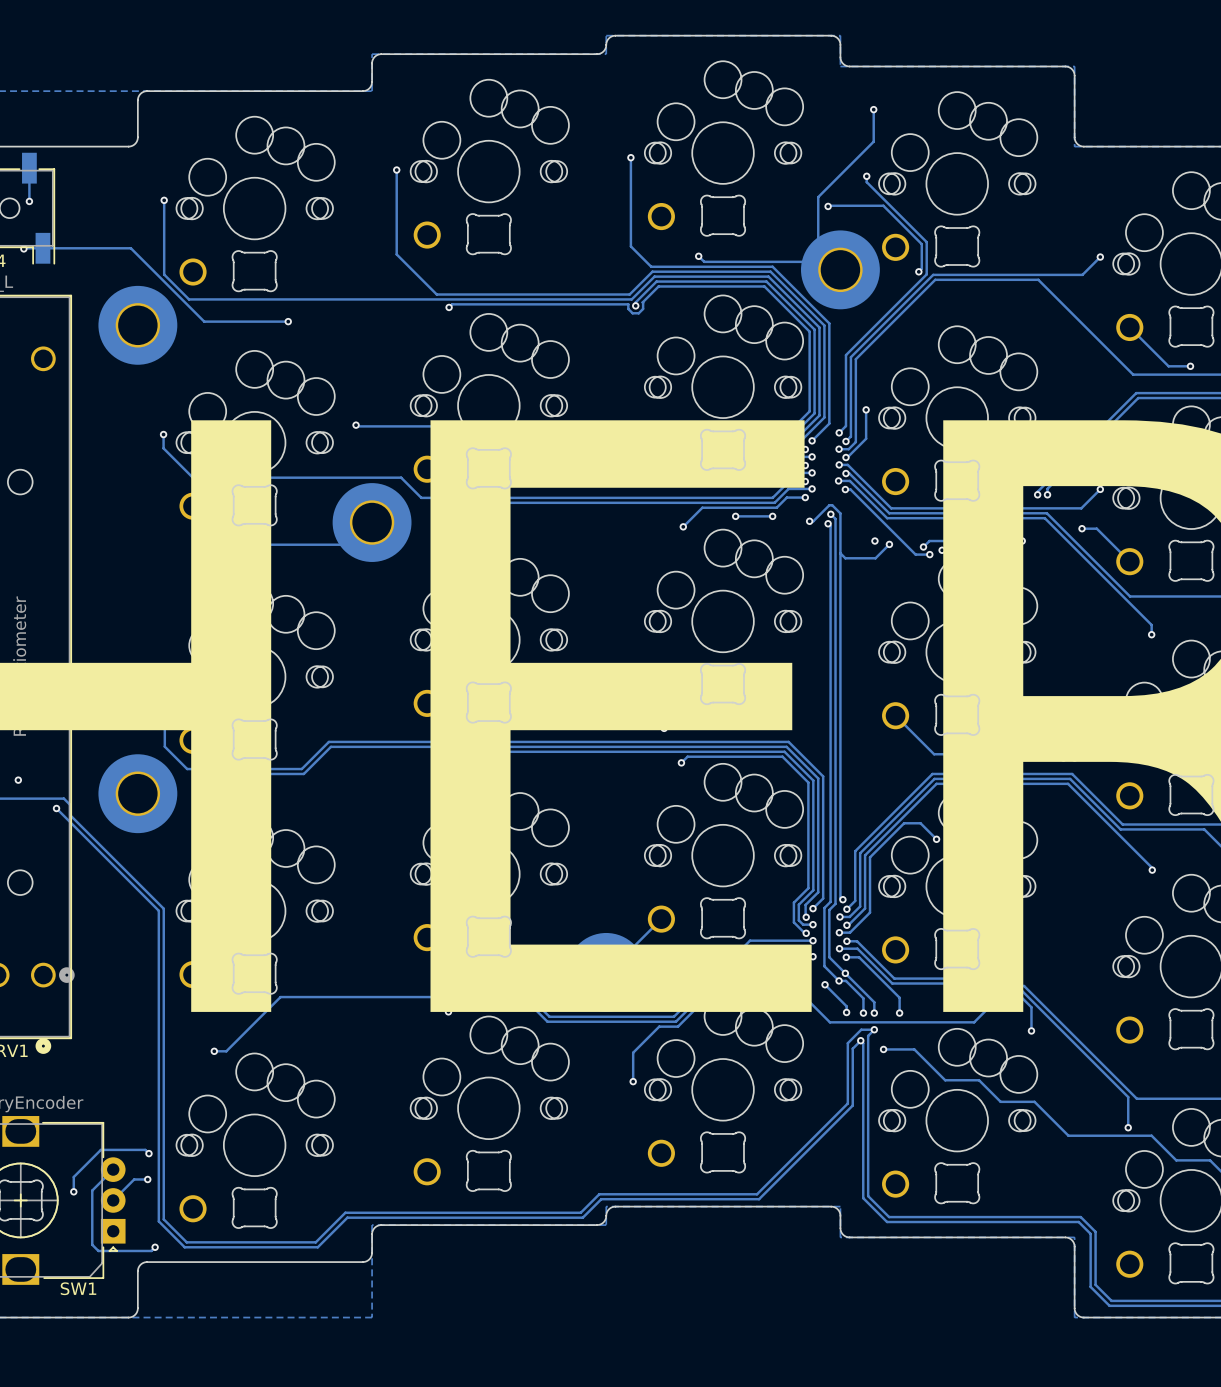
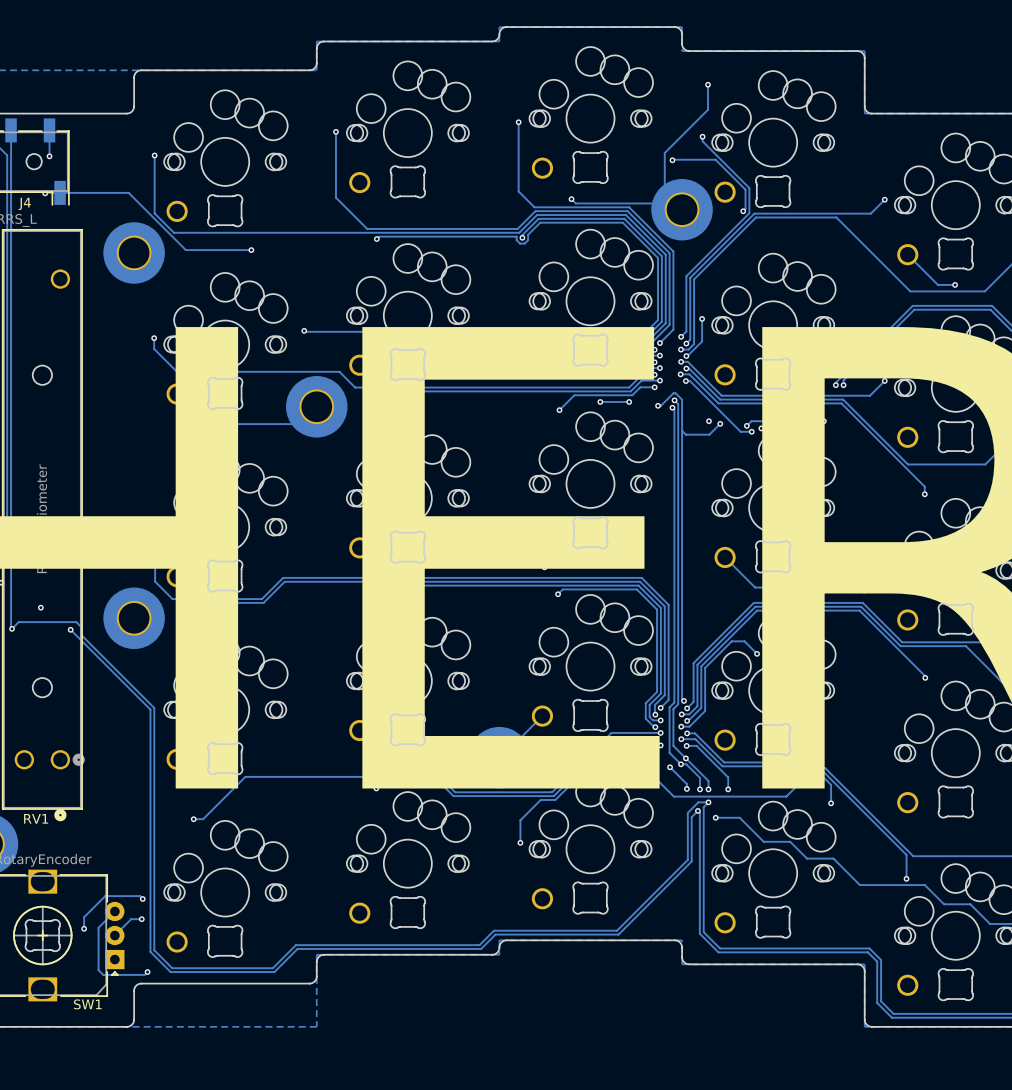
track: (1082, 528) (1096, 528) (1129, 561) -> none
via: (1082, 528) -> none

